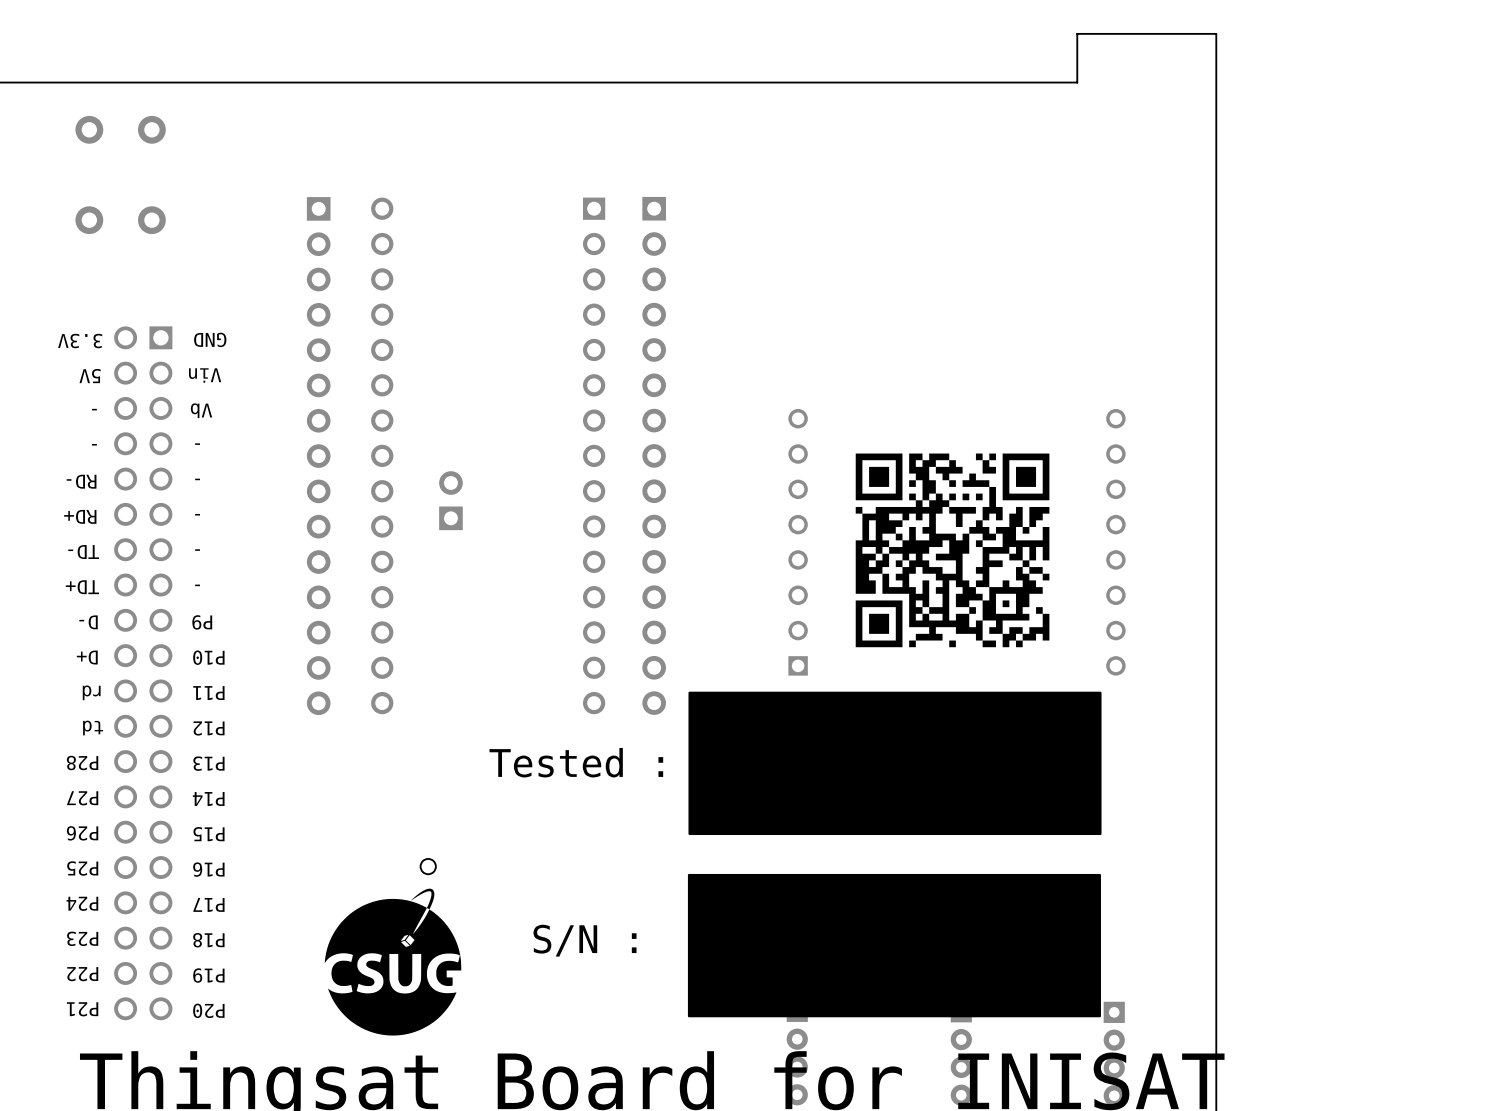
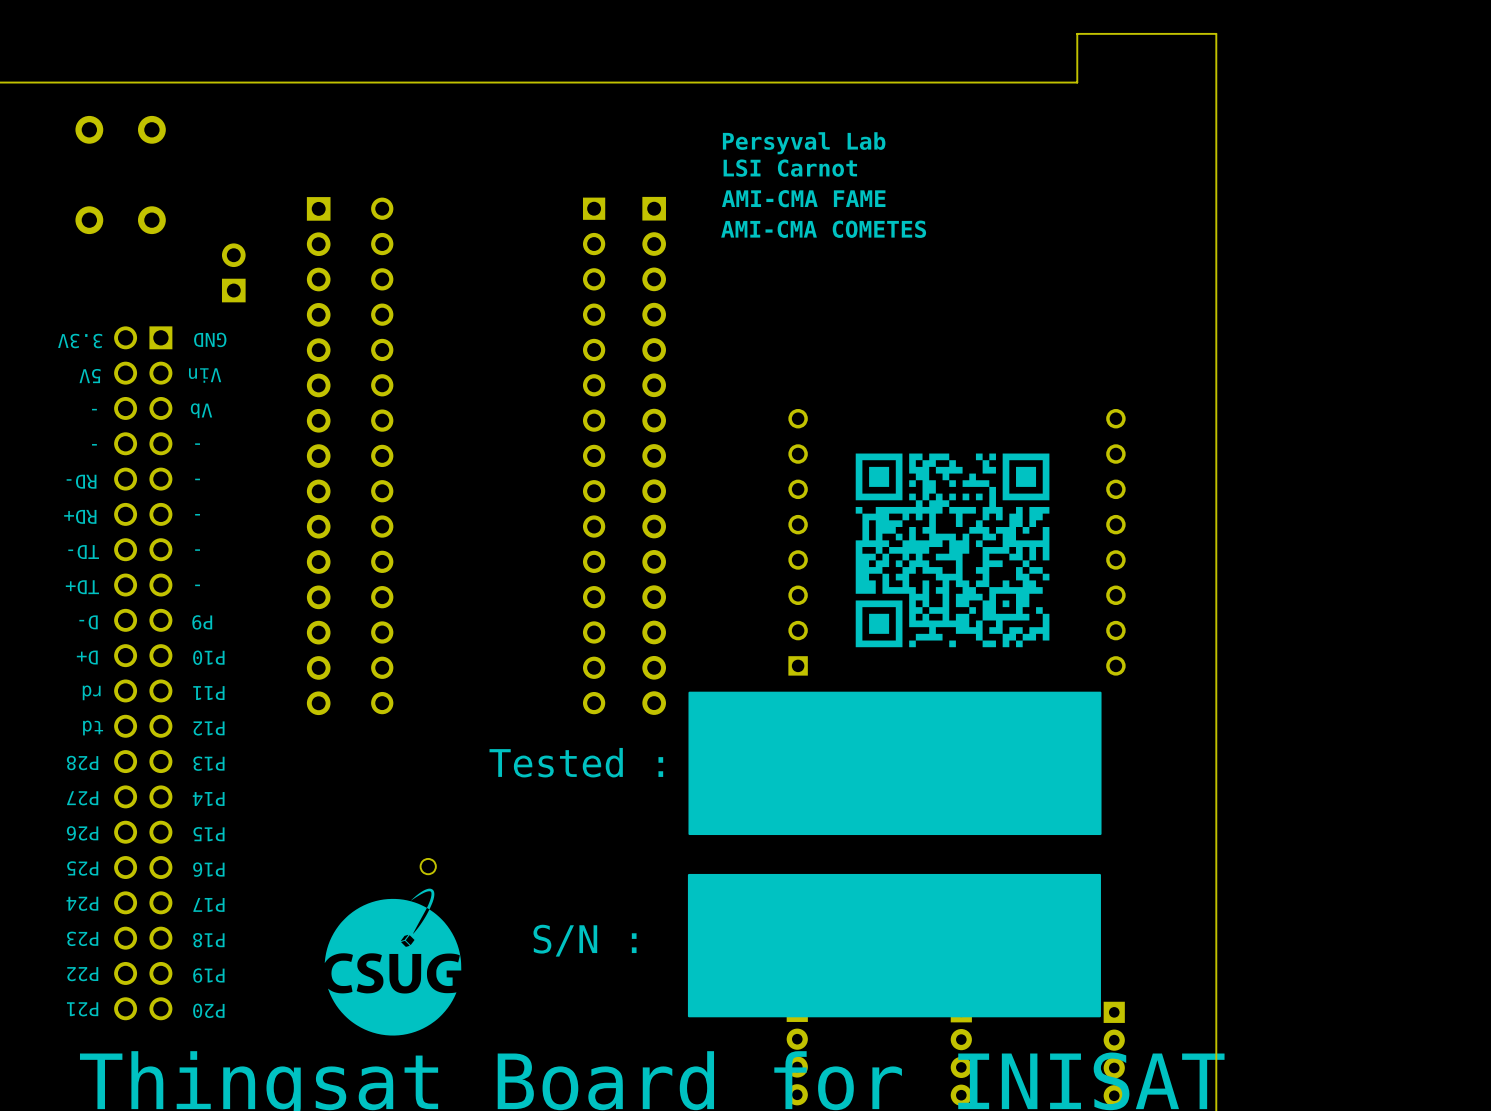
text: none -> Persyval Lab (804, 143)
text: none -> LSI Carnot (790, 168)
text: none -> AMI-CMA FAME (803, 198)
text: none -> AMI-CMA COMETES (823, 229)
part position: (450, 500) -> (233, 272)

